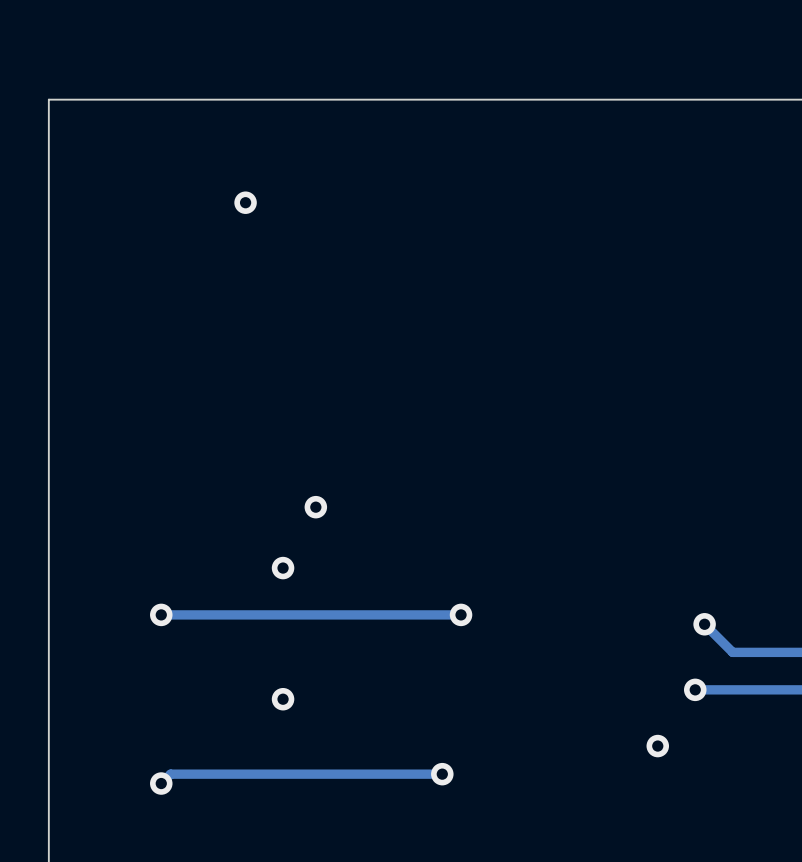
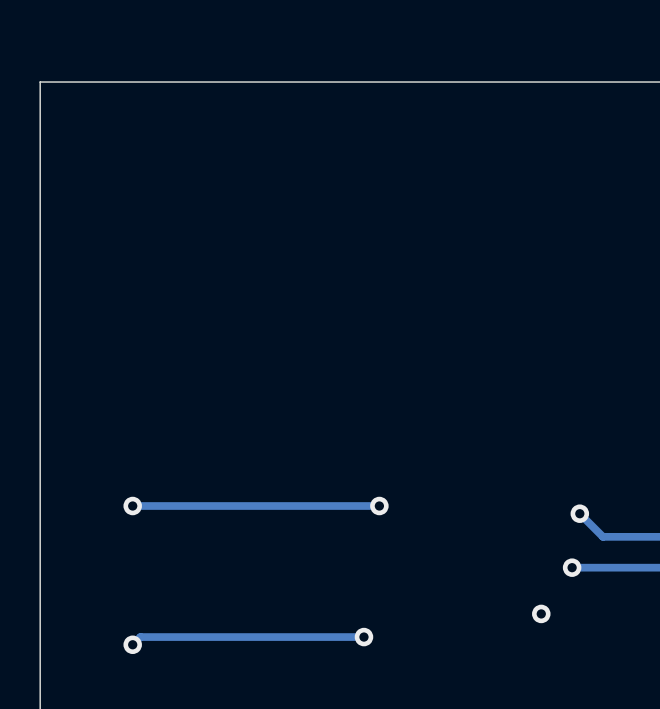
via: (245, 202) -> none
via: (315, 507) -> none
via: (283, 568) -> none
via: (283, 699) -> none

